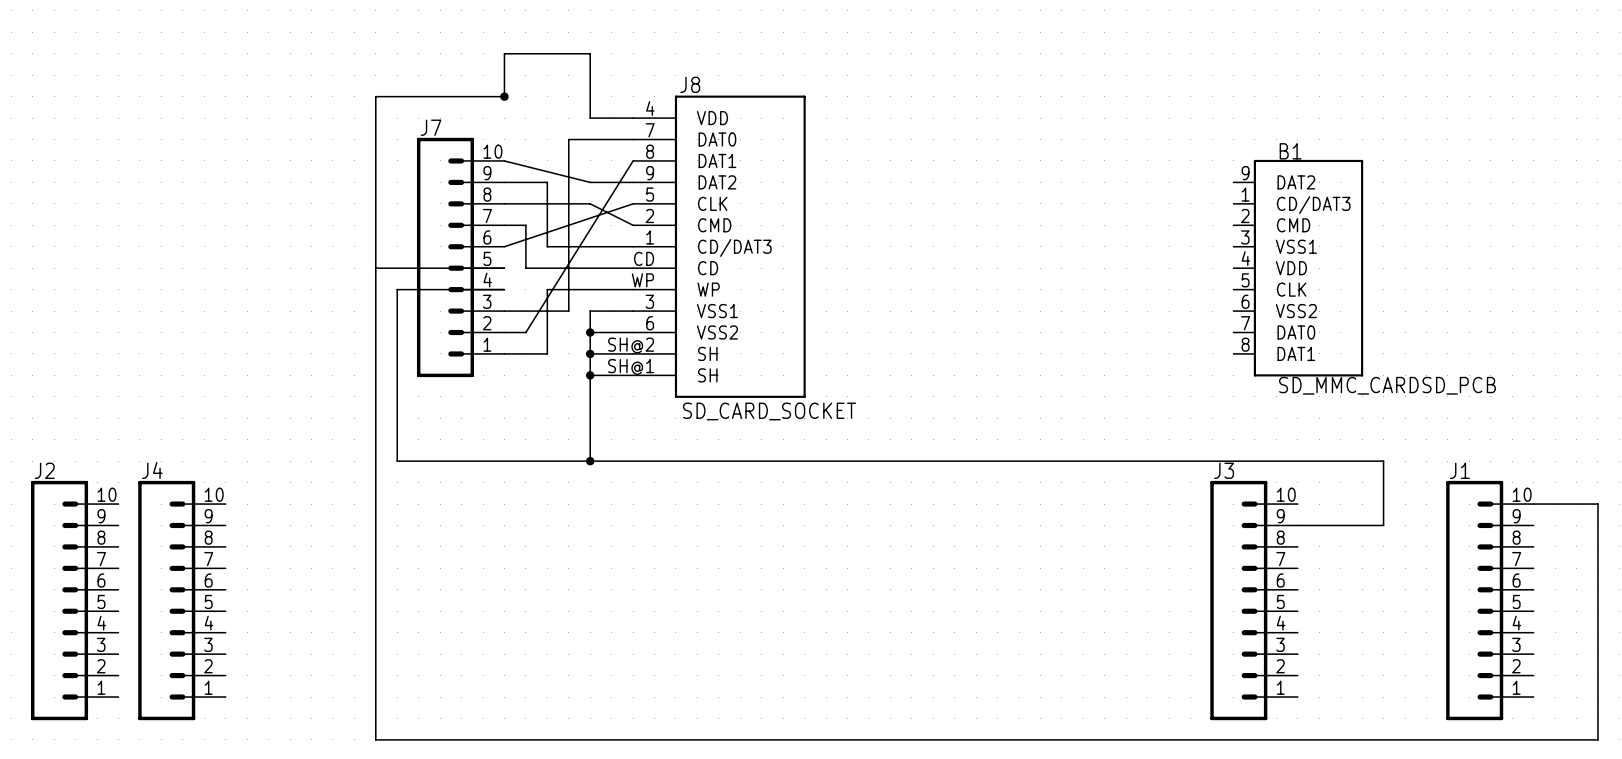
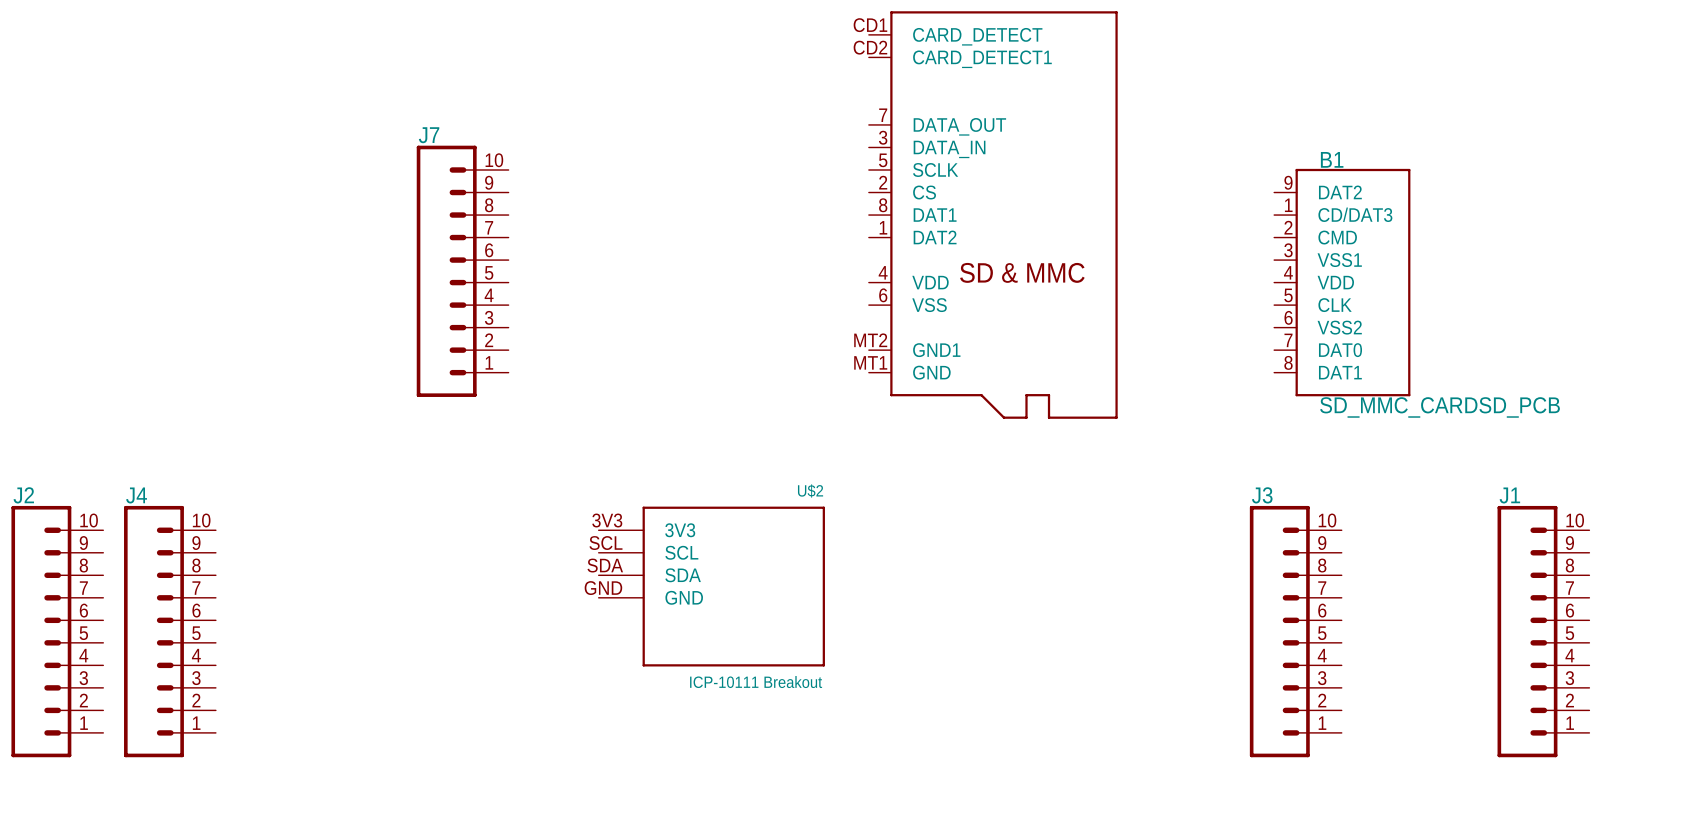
junction: (504, 96) -> none
wire: (633, 118) (590, 118) (590, 53) (504, 53) (504, 96) (375, 96) (375, 739) (1597, 739) (1597, 504) (1533, 504) -> none
wire: (633, 139) (568, 139) (568, 311) (504, 311) -> none
wire: (504, 160) (590, 182) (633, 182) -> none
wire: (633, 160) (525, 332) (504, 332) -> none
wire: (504, 182) (547, 182) (547, 246) (633, 246) -> none
wire: (504, 203) (590, 203) (633, 225) -> none
wire: (633, 203) (504, 246) -> none
part: none -> (993, 215)
wire: (504, 225) (525, 225) (525, 268) (633, 268) -> none
J8: SD_CARD_SOCKET (719, 246) -> none
wire: (375, 268) (504, 268) -> none
wire: (504, 289) (397, 289) (397, 461) (1383, 461) (1383, 525) (1297, 525) -> none
wire: (633, 289) (547, 289) (547, 353) (504, 353) -> none
wire: (633, 311) (590, 311) (590, 461) -> none
wire: (590, 332) (633, 332) -> none
junction: (590, 332) -> none
wire: (590, 353) (633, 353) -> none
junction: (590, 353) -> none
wire: (590, 375) (633, 375) -> none
junction: (590, 375) -> none
junction: (590, 461) -> none
U$2: none -> (711, 586)

